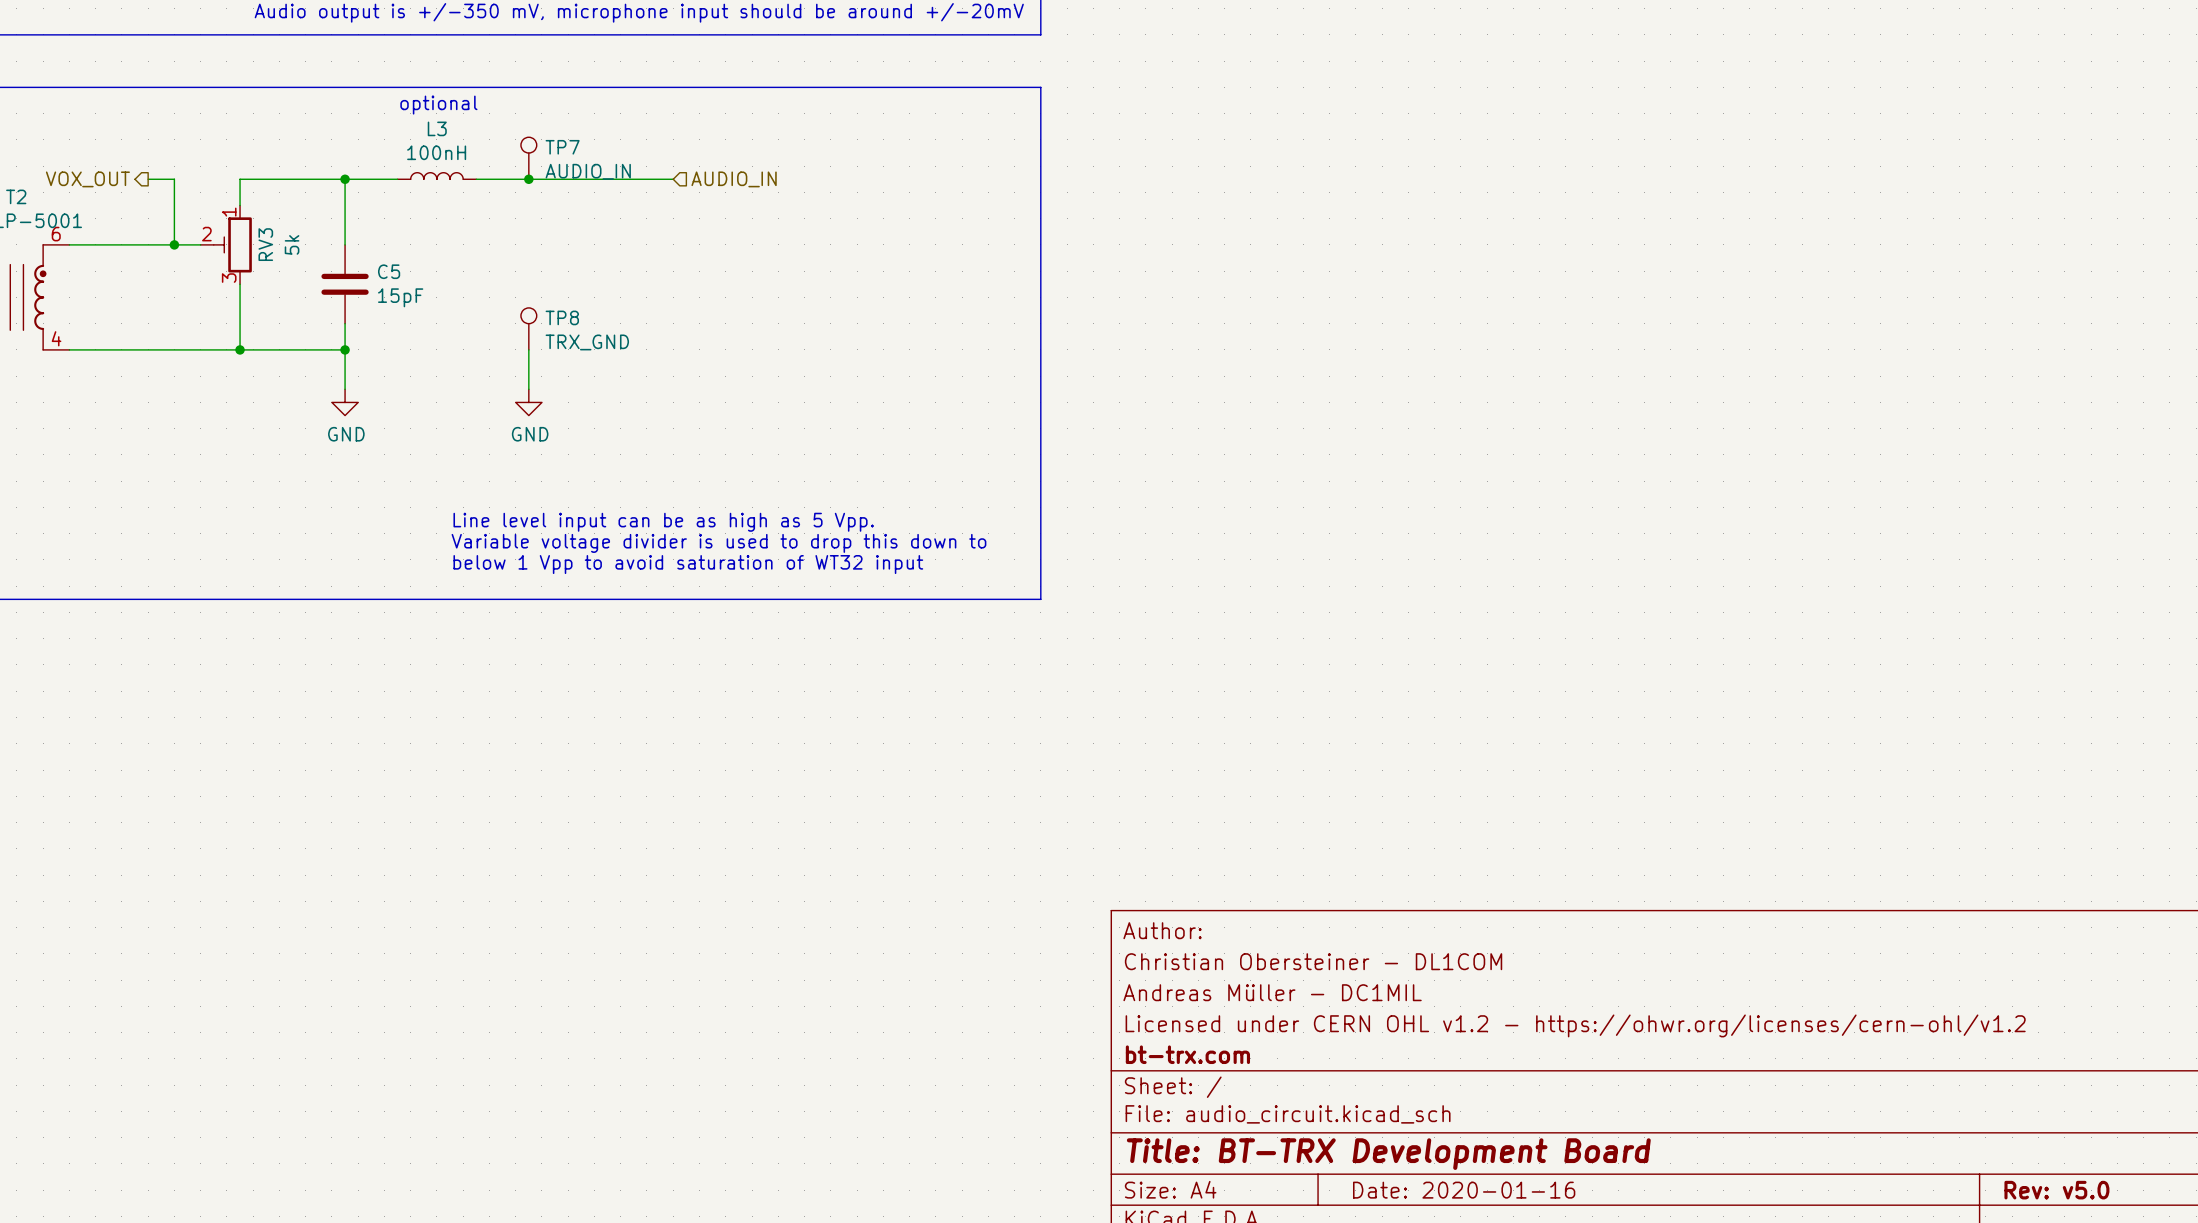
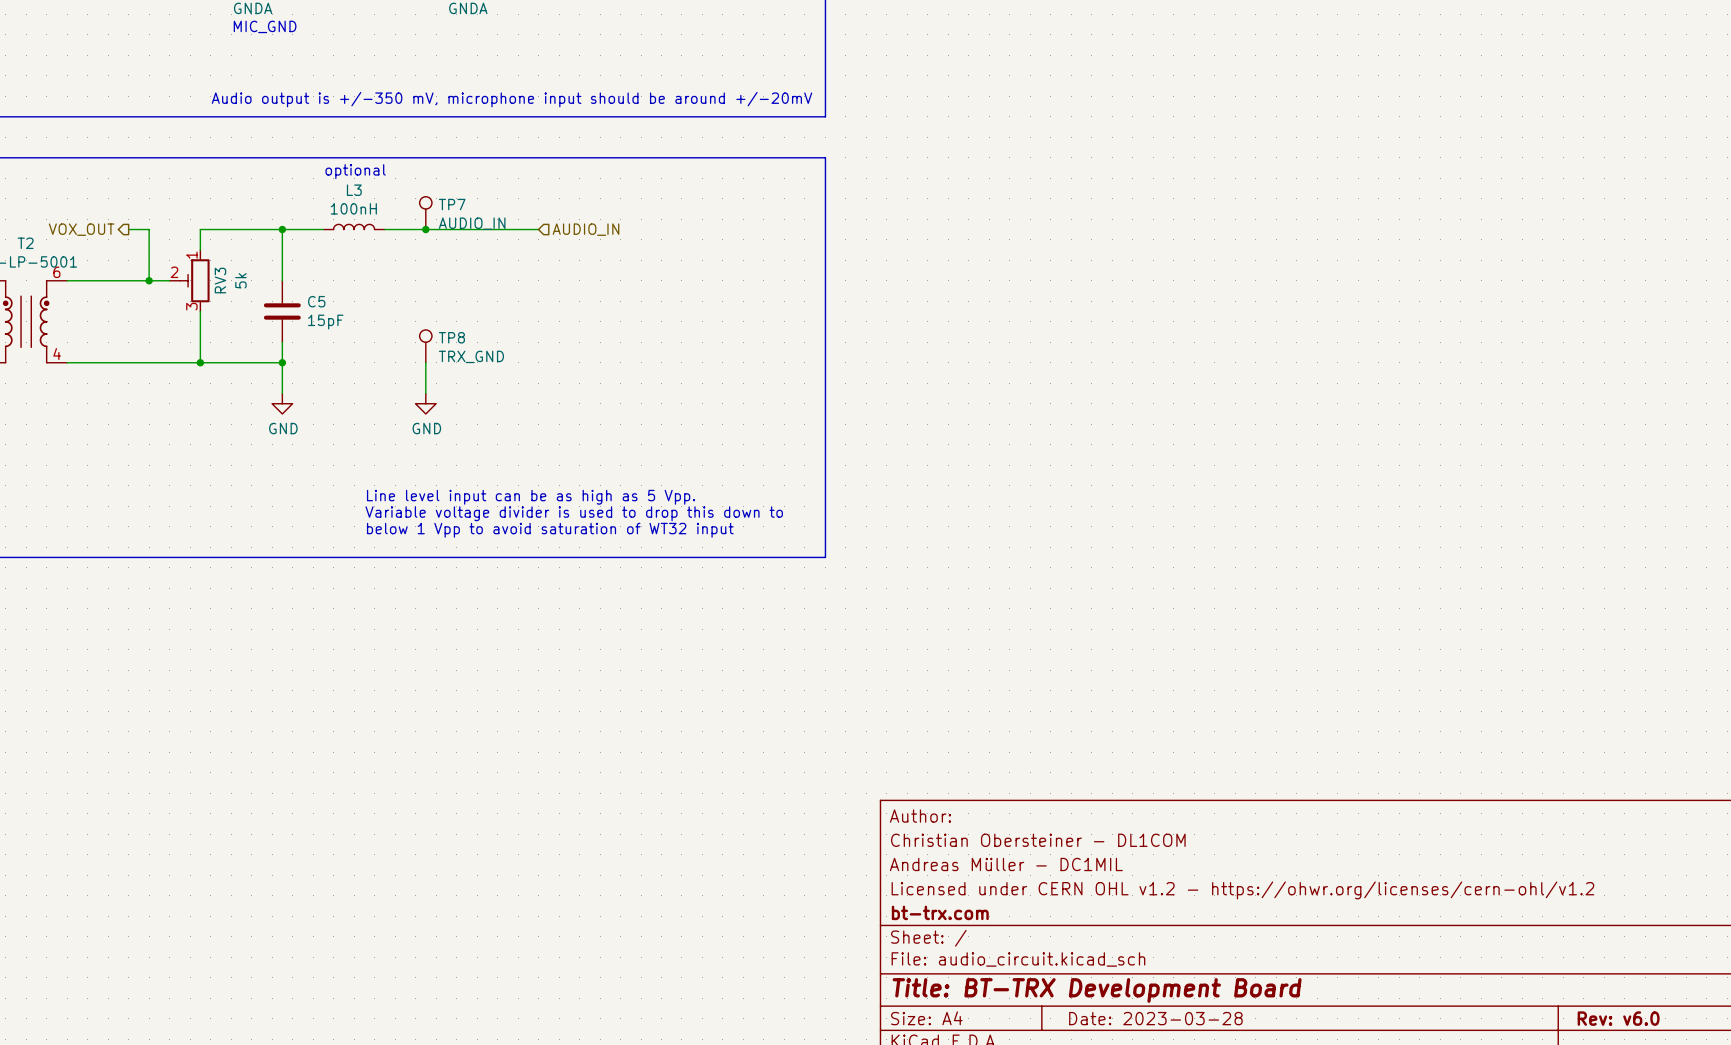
title block: Date: 2020-01-16 (1464, 1190) -> Date: 2023-03-28 (1155, 1018)
title block: Rev: v5.0 (2056, 1190) -> Rev: v6.0 (1618, 1018)

